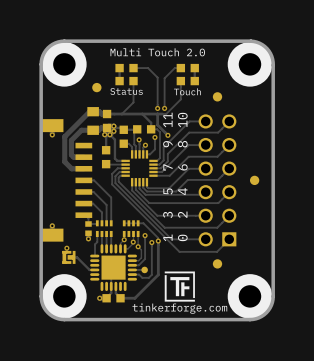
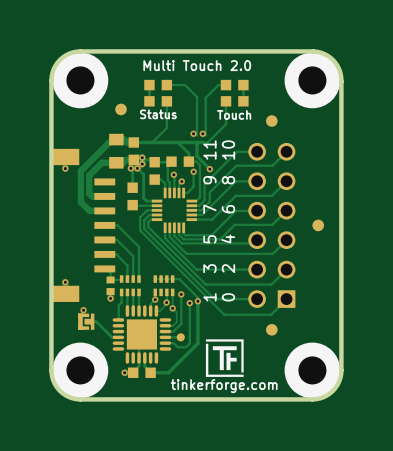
via: none -> (193, 133)
via: none -> (202, 133)
via: (157, 108) -> none
via: (164, 108) -> none

